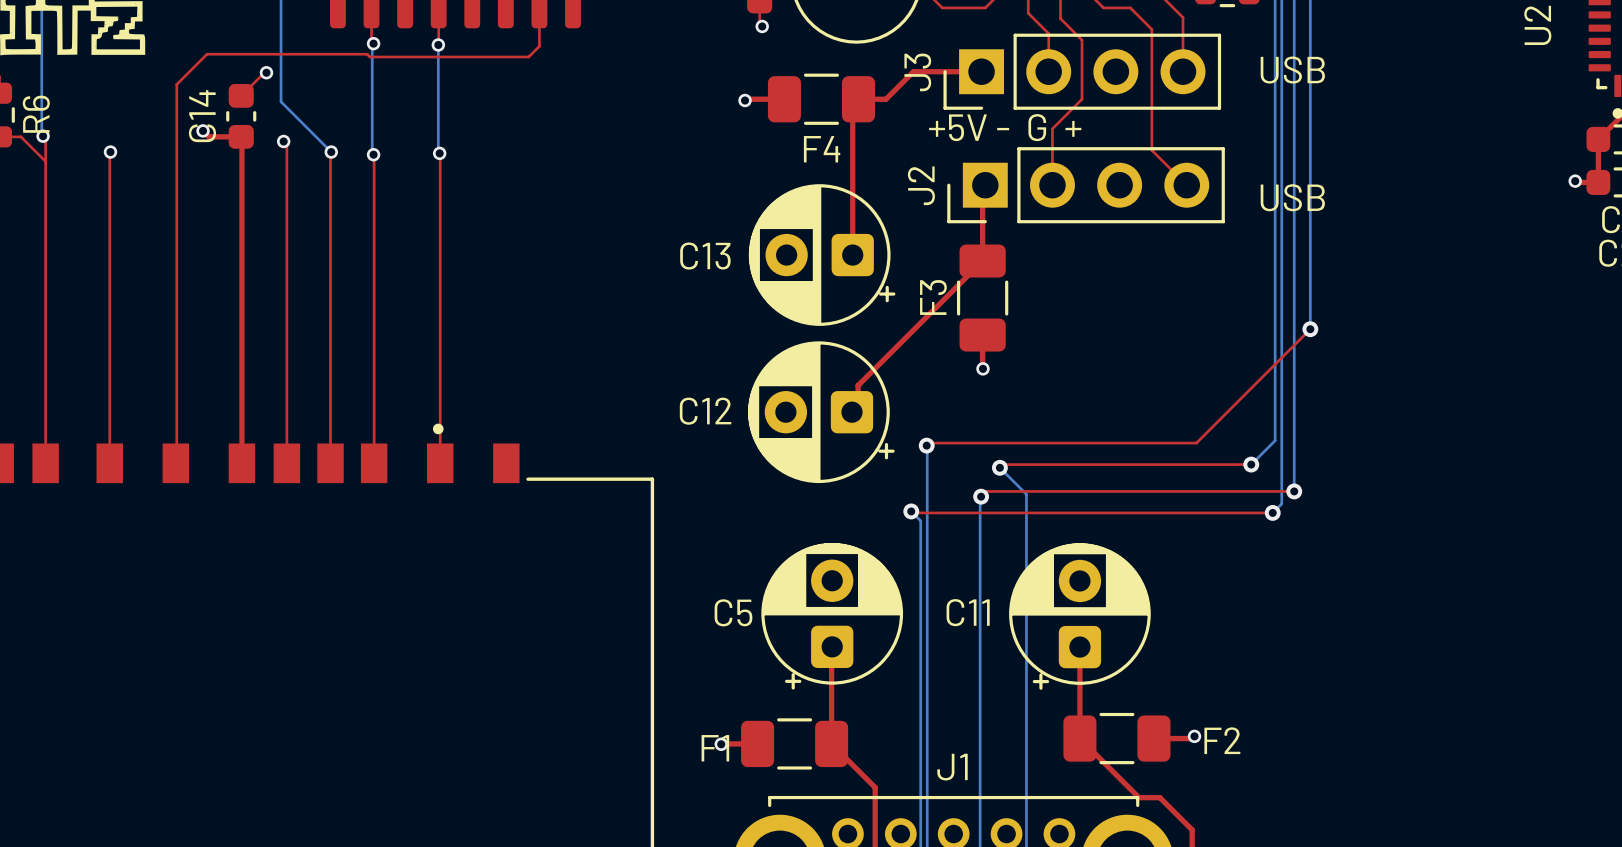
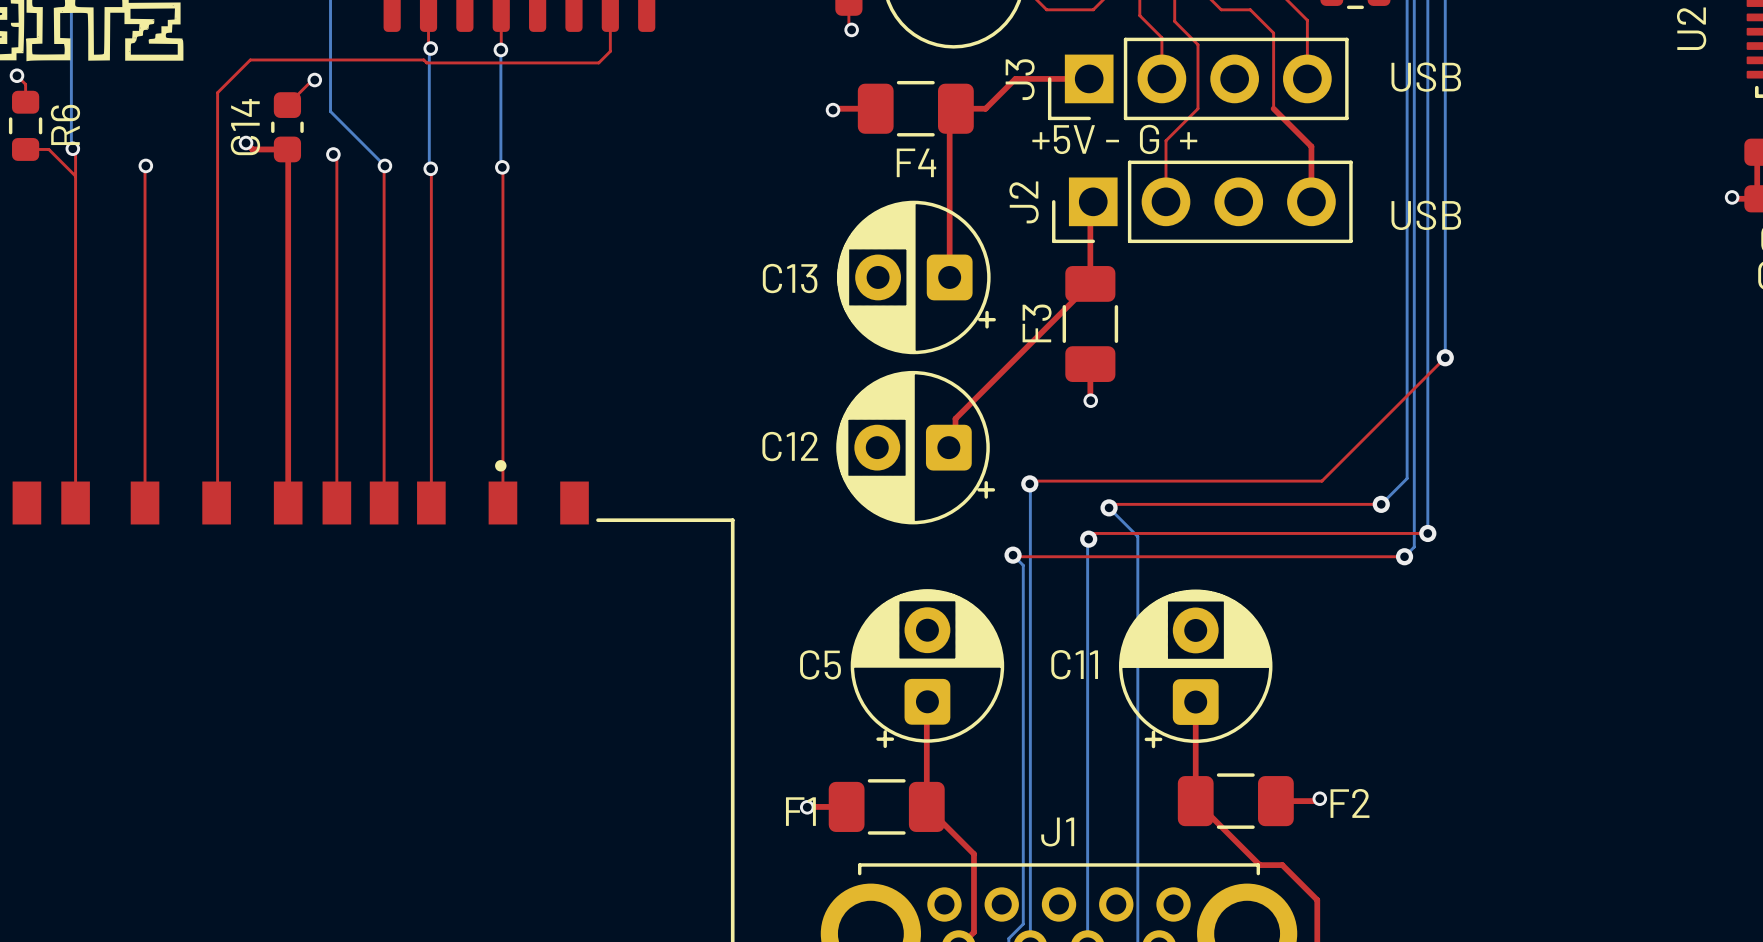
top track: (1151, 99) (1151, 150) (1186, 185) -> (1273, 108) (1311, 146) (1311, 201)

